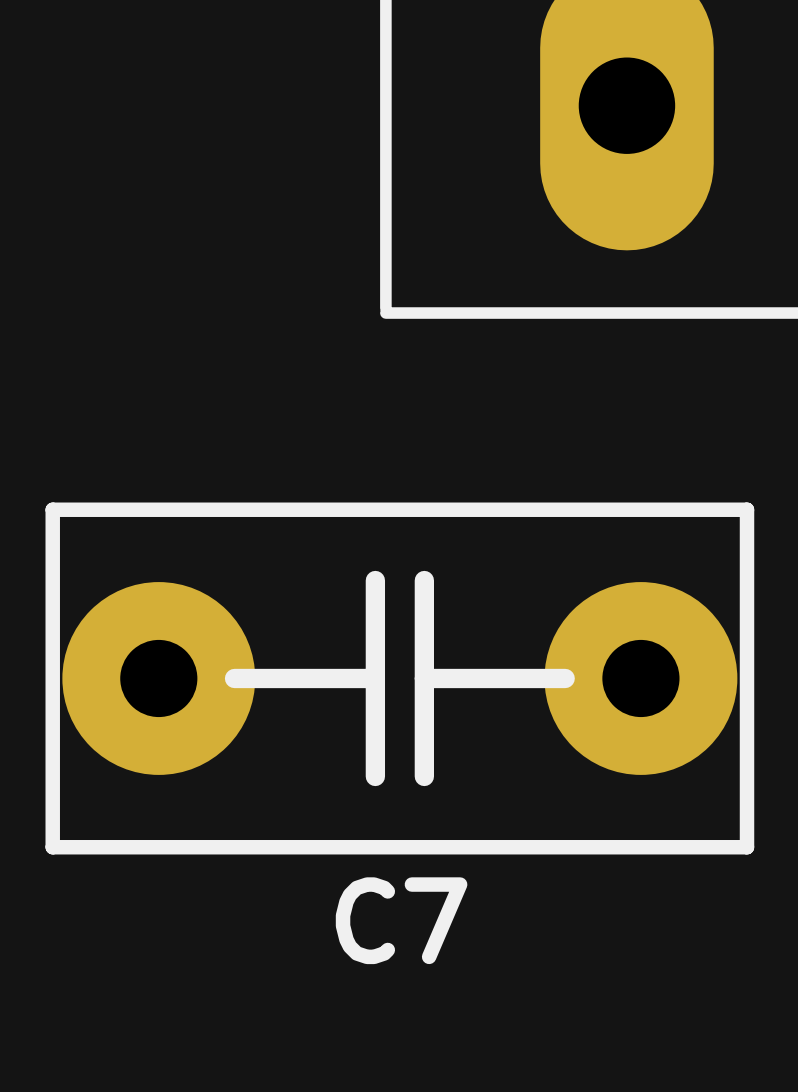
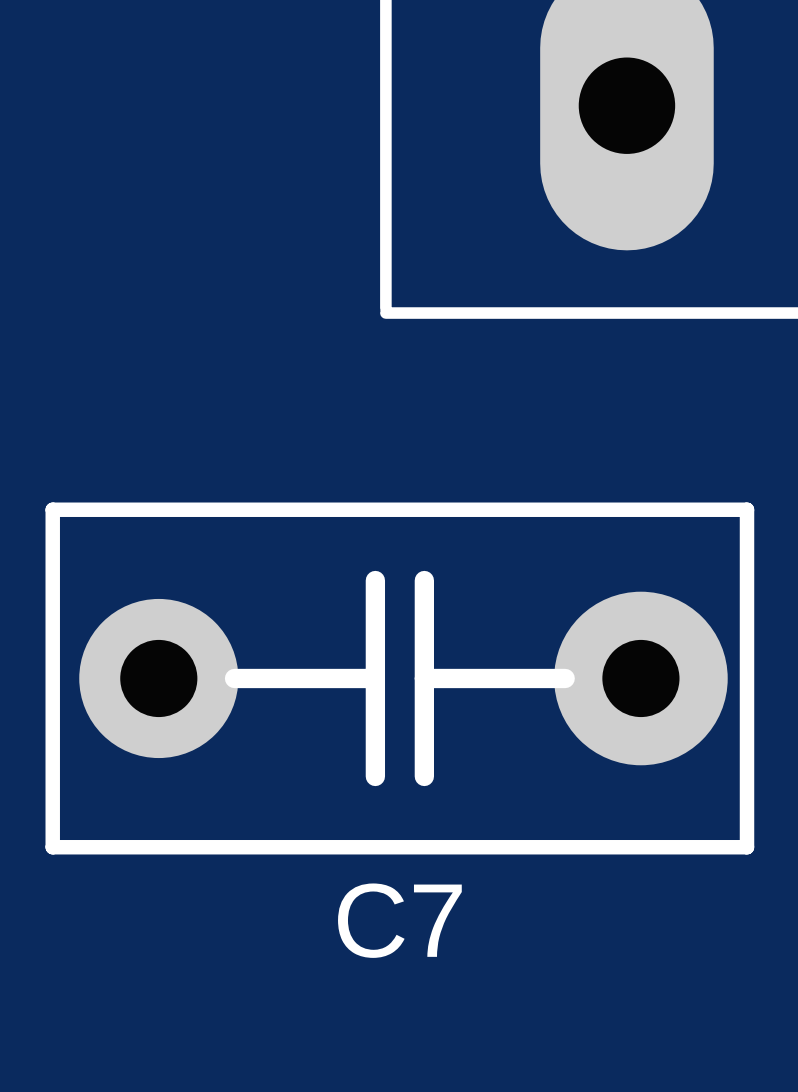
C7 footprint: [45, 502, 755, 855] -> [45, 502, 755, 855]

